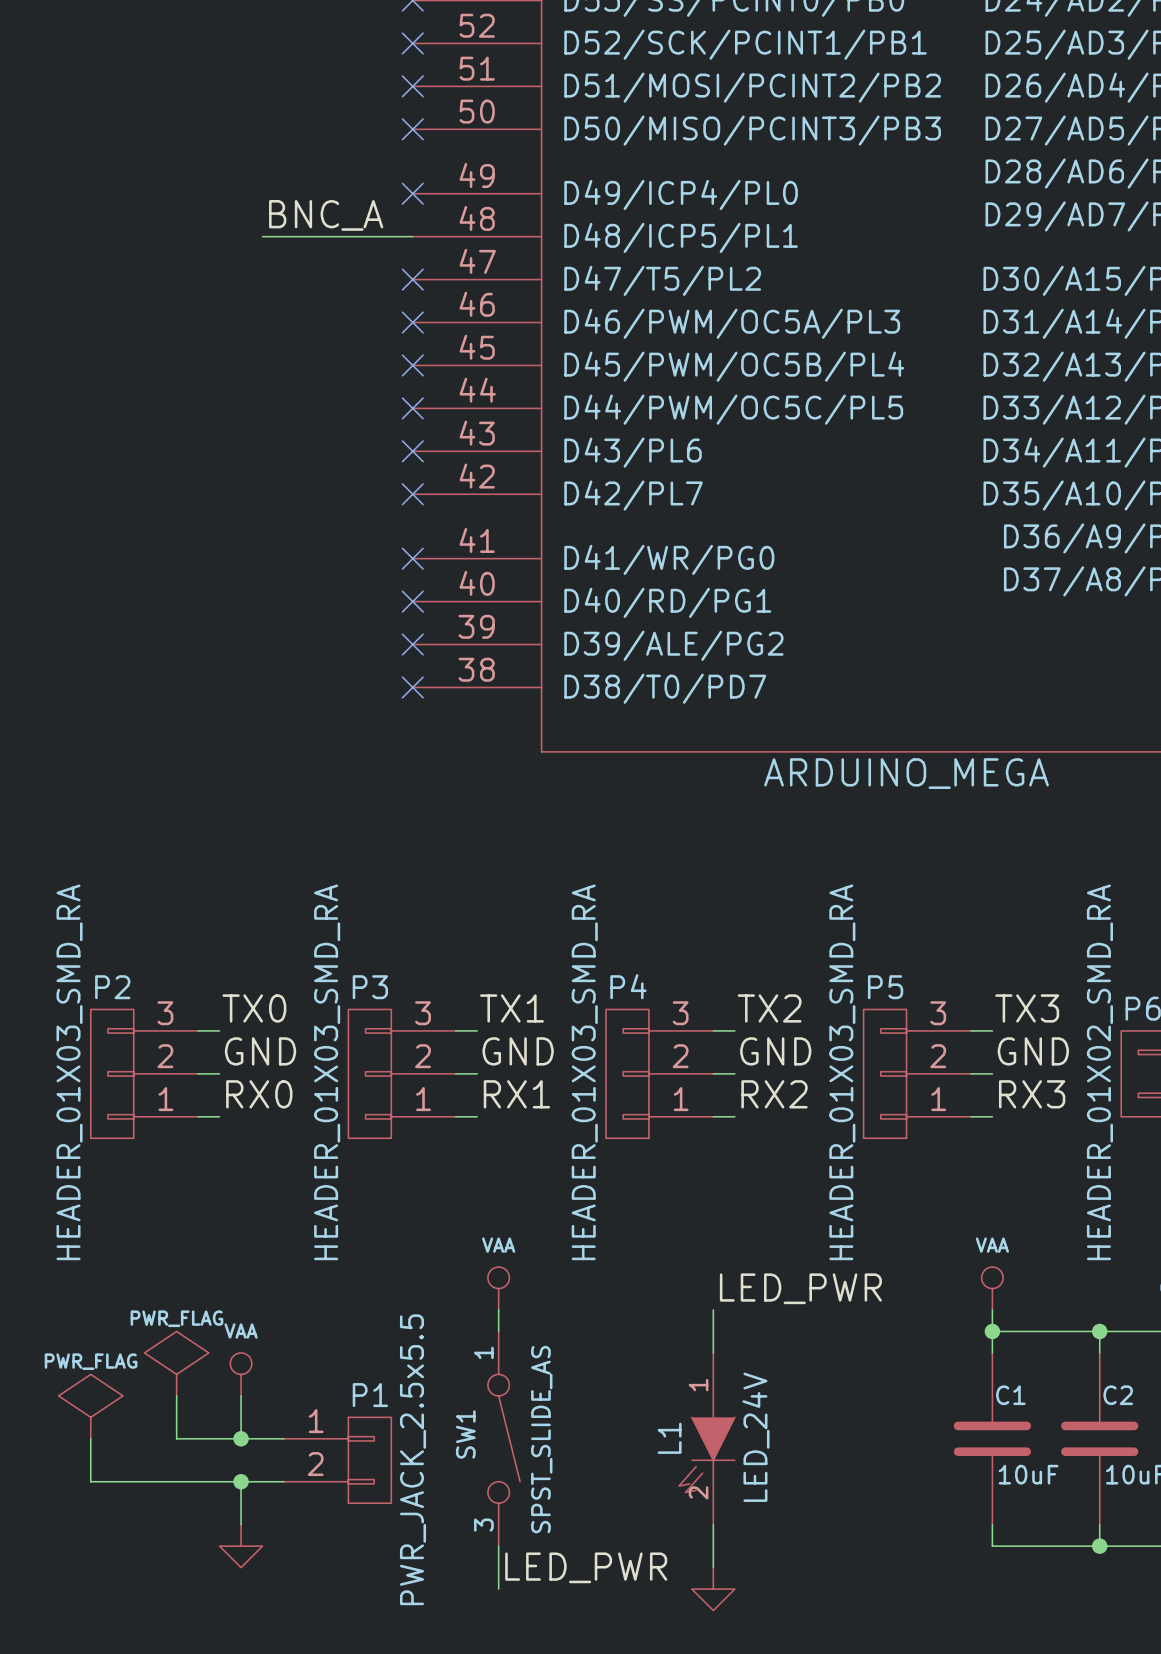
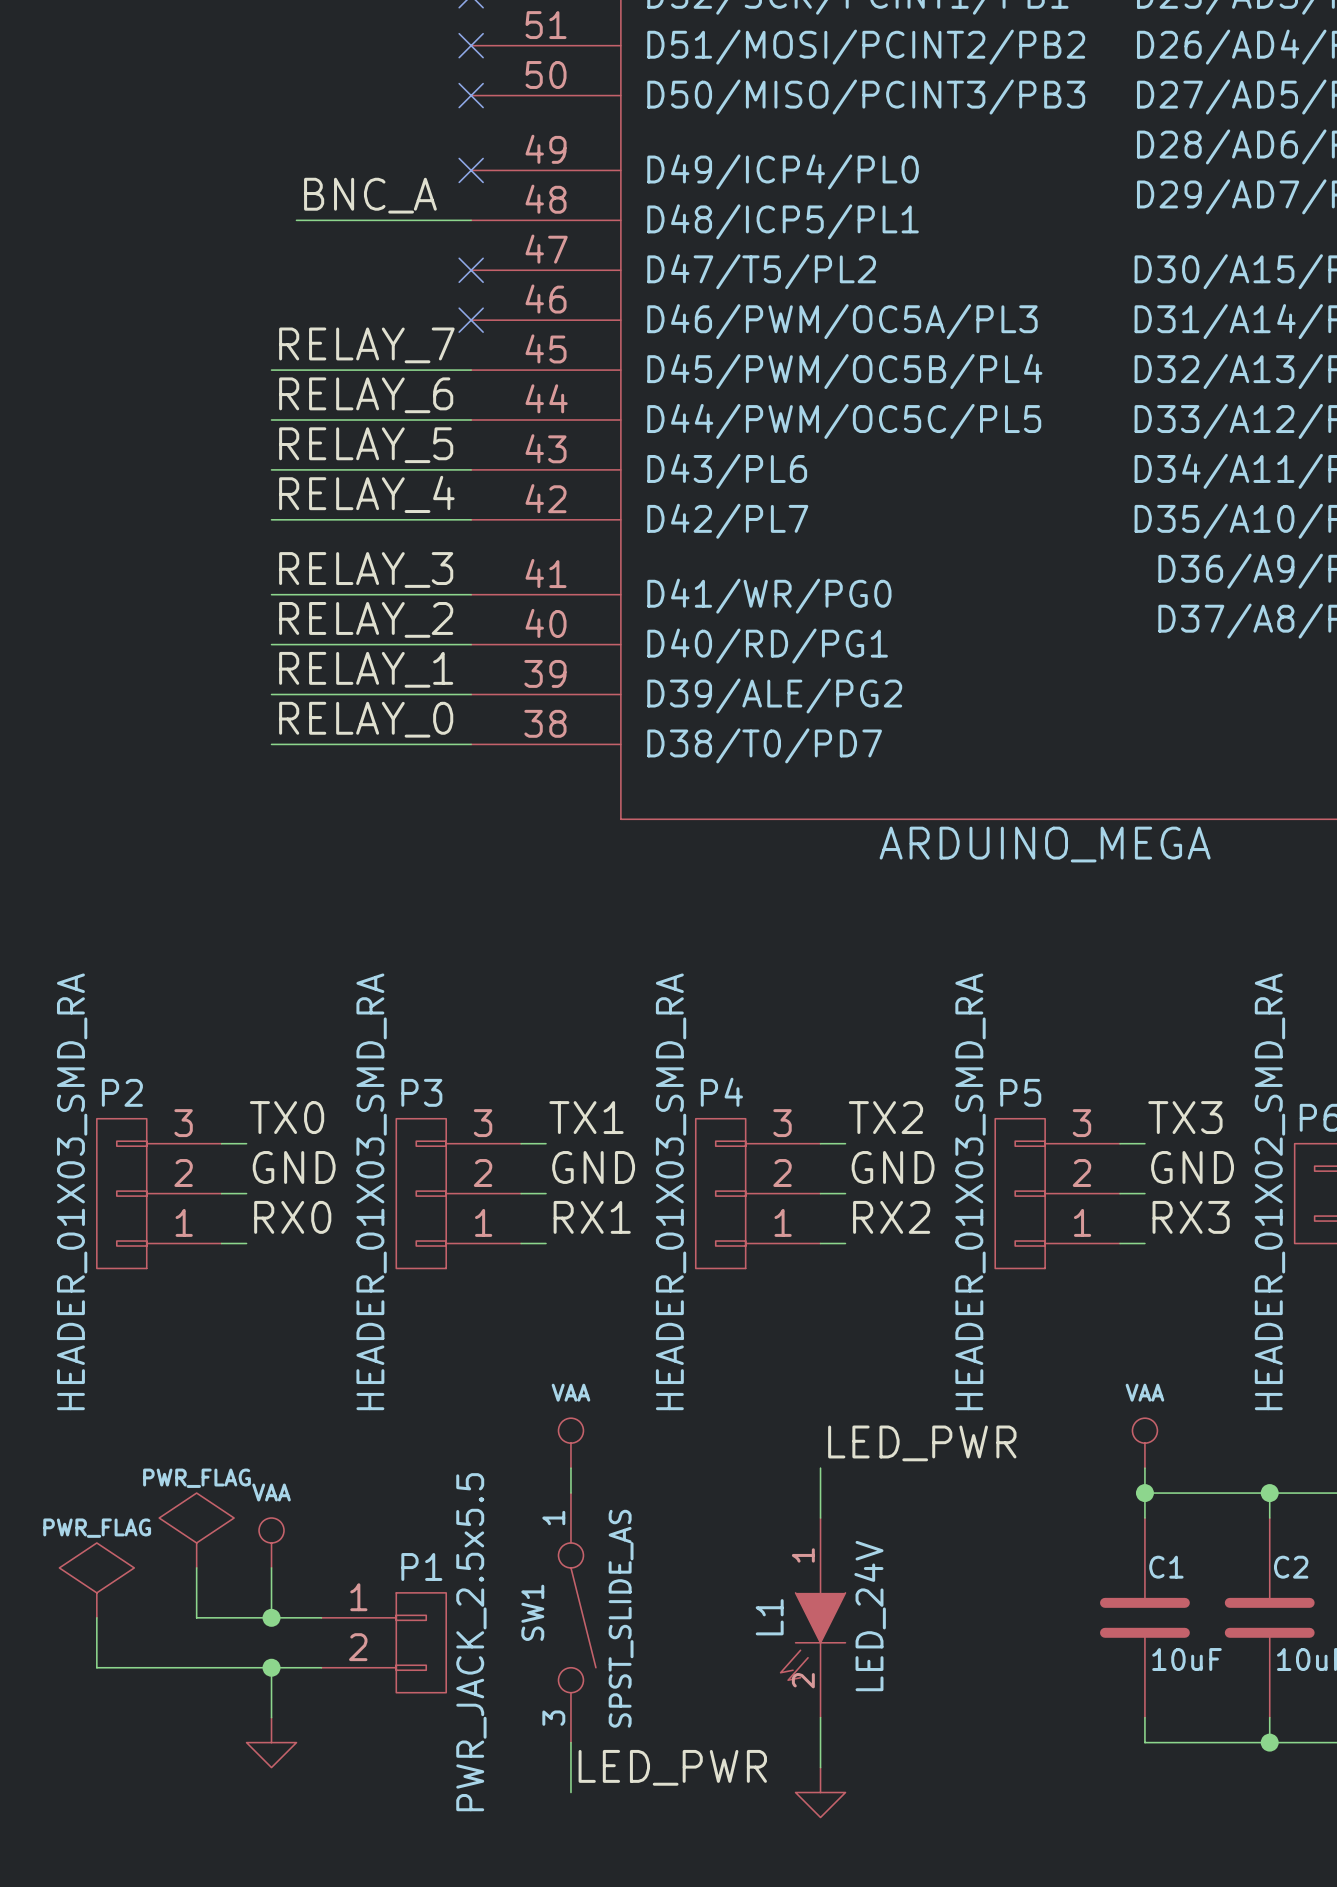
label: none -> RELAY_7 (366, 345)
wire: none -> (271, 370) (471, 370)
no-connect mark: (412, 365) -> none
label: none -> RELAY_6 (366, 395)
wire: none -> (271, 419) (471, 419)
no-connect mark: (412, 408) -> none
label: none -> RELAY_5 (366, 445)
wire: none -> (271, 469) (471, 469)
no-connect mark: (412, 451) -> none
label: none -> RELAY_4 (366, 494)
wire: none -> (271, 519) (471, 519)
no-connect mark: (412, 494) -> none
label: none -> RELAY_3 (366, 569)
wire: none -> (271, 594) (471, 594)
no-connect mark: (412, 558) -> none
label: none -> RELAY_2 (366, 619)
wire: none -> (271, 644) (471, 644)
no-connect mark: (412, 601) -> none
label: none -> RELAY_1 (366, 669)
wire: none -> (271, 694) (471, 694)
no-connect mark: (412, 644) -> none
label: none -> RELAY_0 (366, 719)
wire: none -> (271, 744) (471, 744)
no-connect mark: (412, 687) -> none

